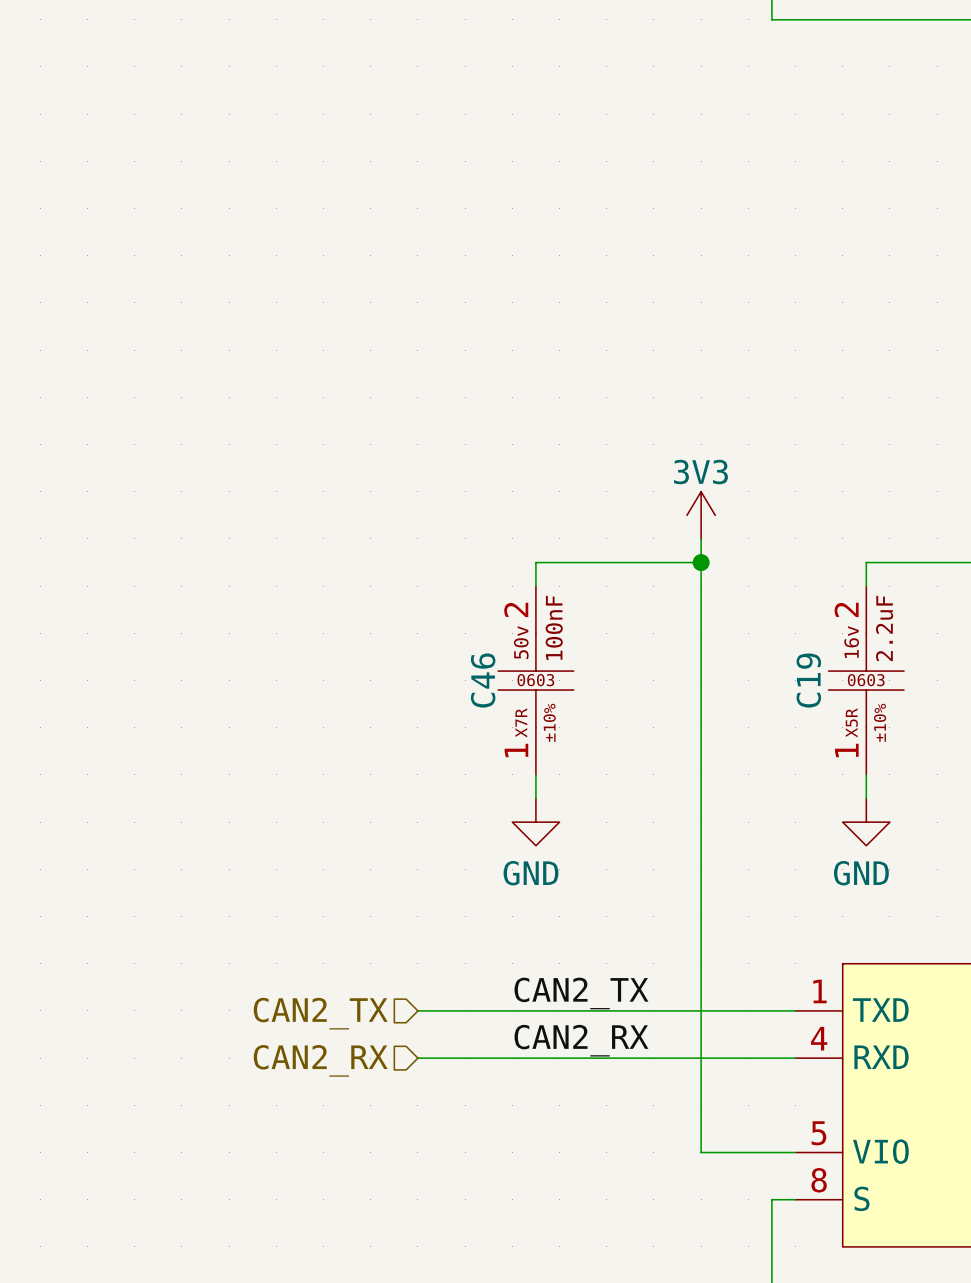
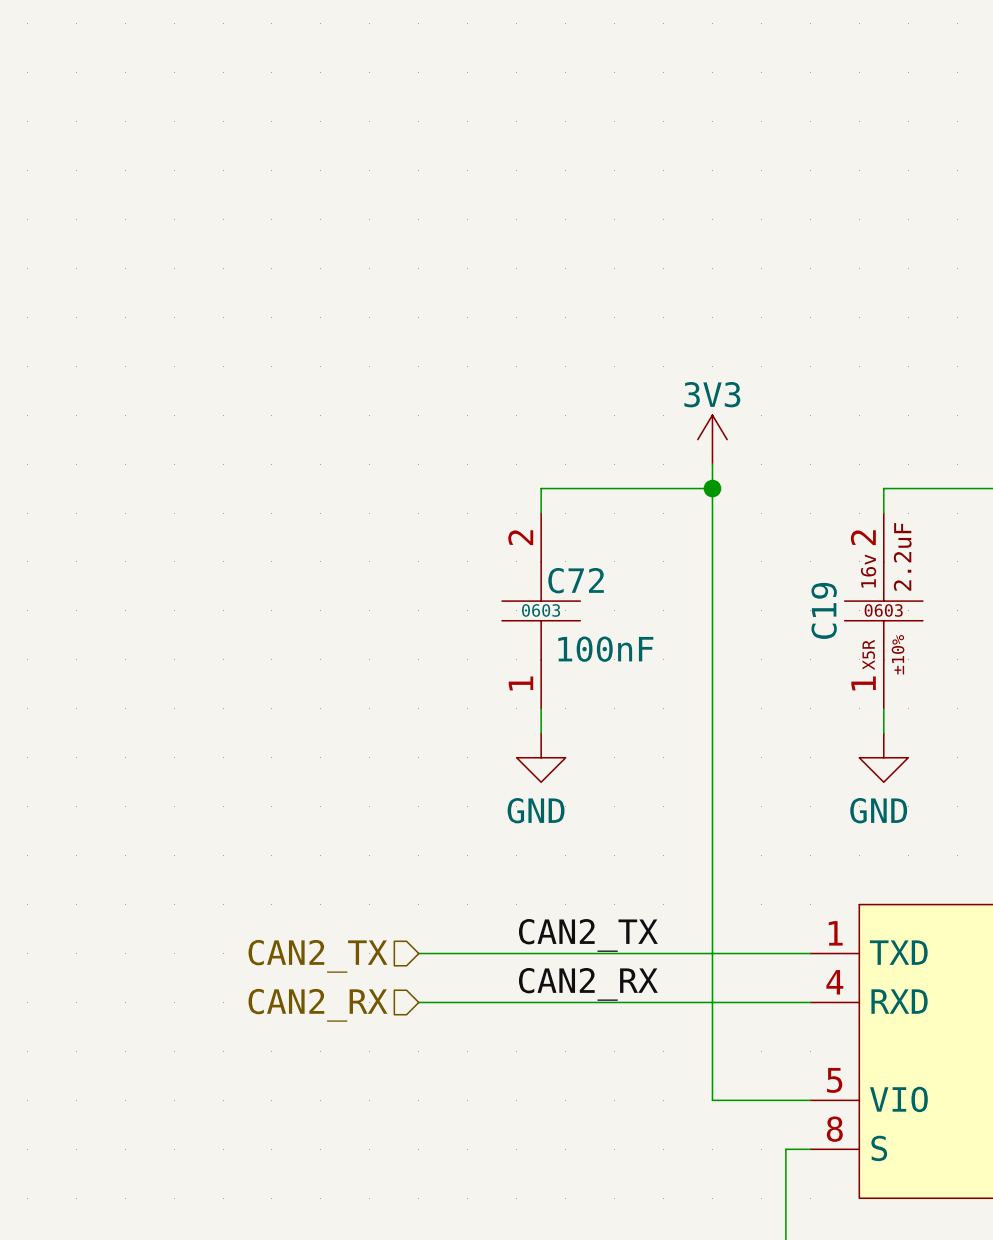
C46 text: 100nF (554, 627) -> none
C46 text: 50v (521, 642) -> none
C46 name: C46 (483, 680) -> C72 (576, 580)
C46 text: 0603 (535, 680) -> none
C46 text: none -> 0603 (541, 610)
C46 text: none -> 100nF (605, 649)
C46 text: X7R (521, 722) -> none
C46 text: ±10% (549, 722) -> none

